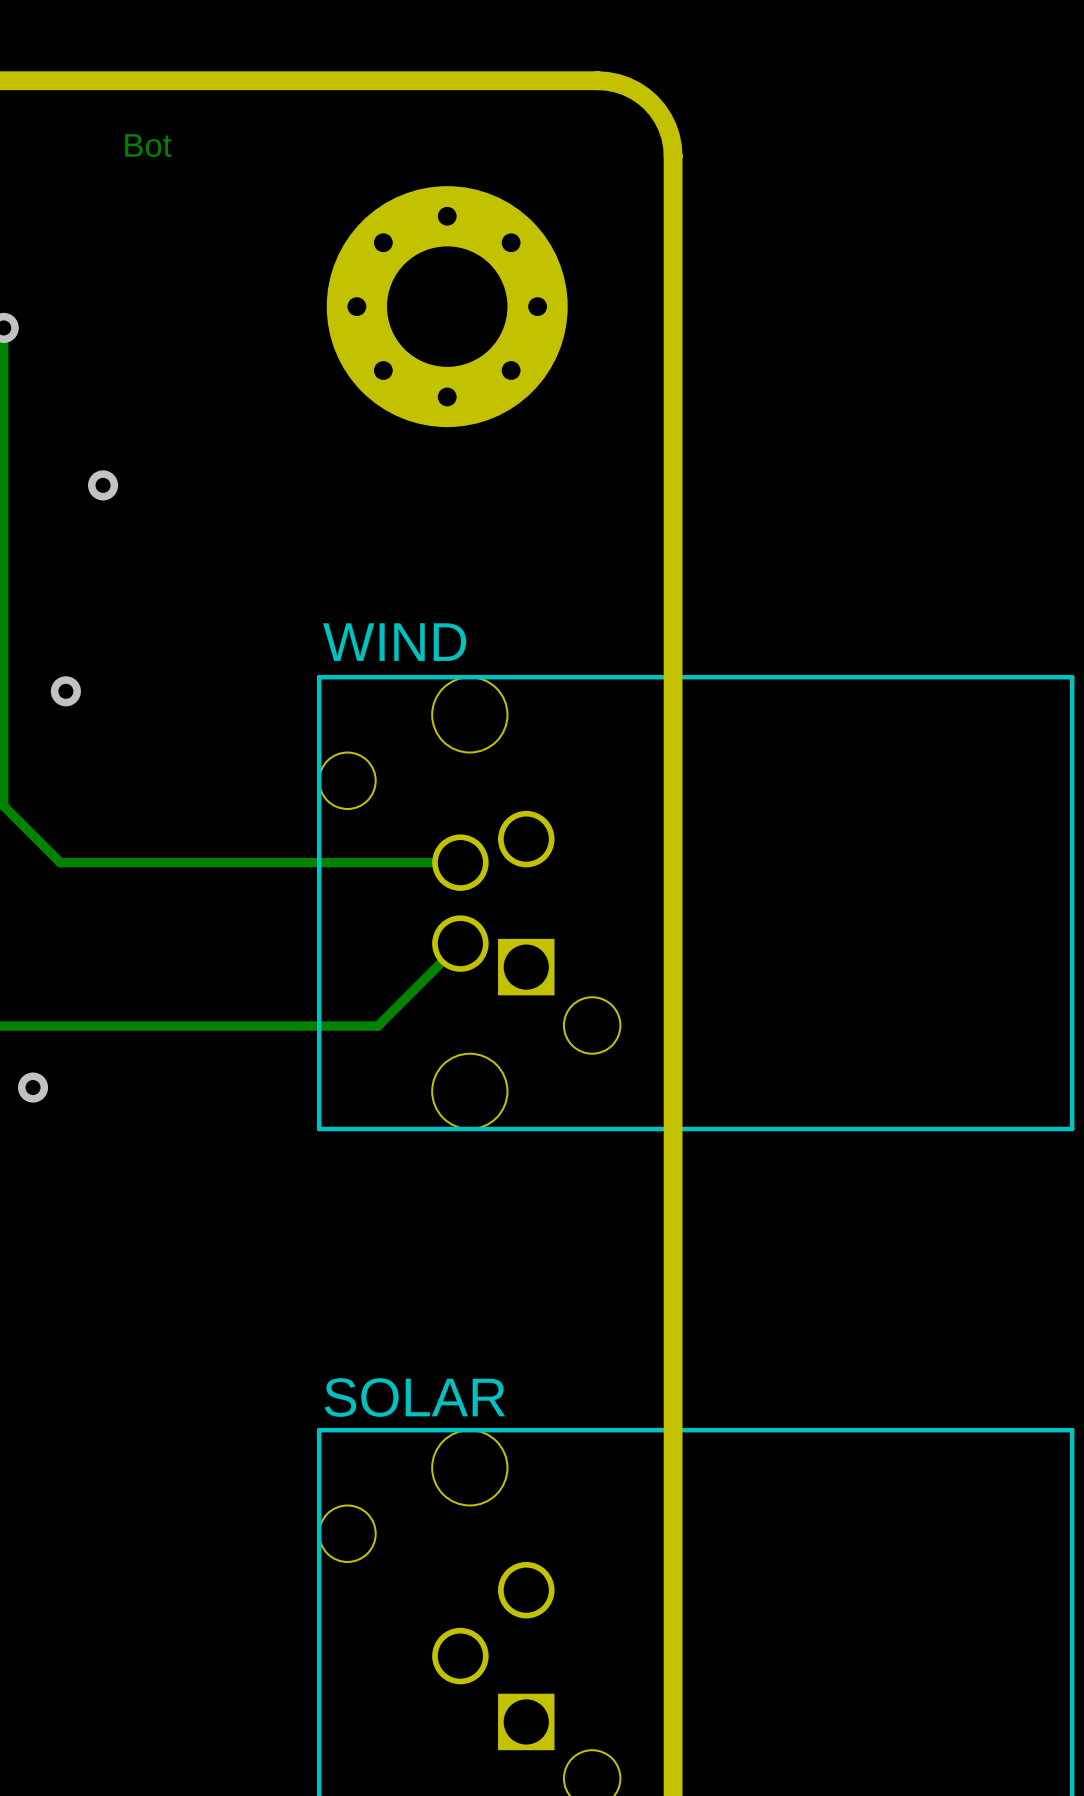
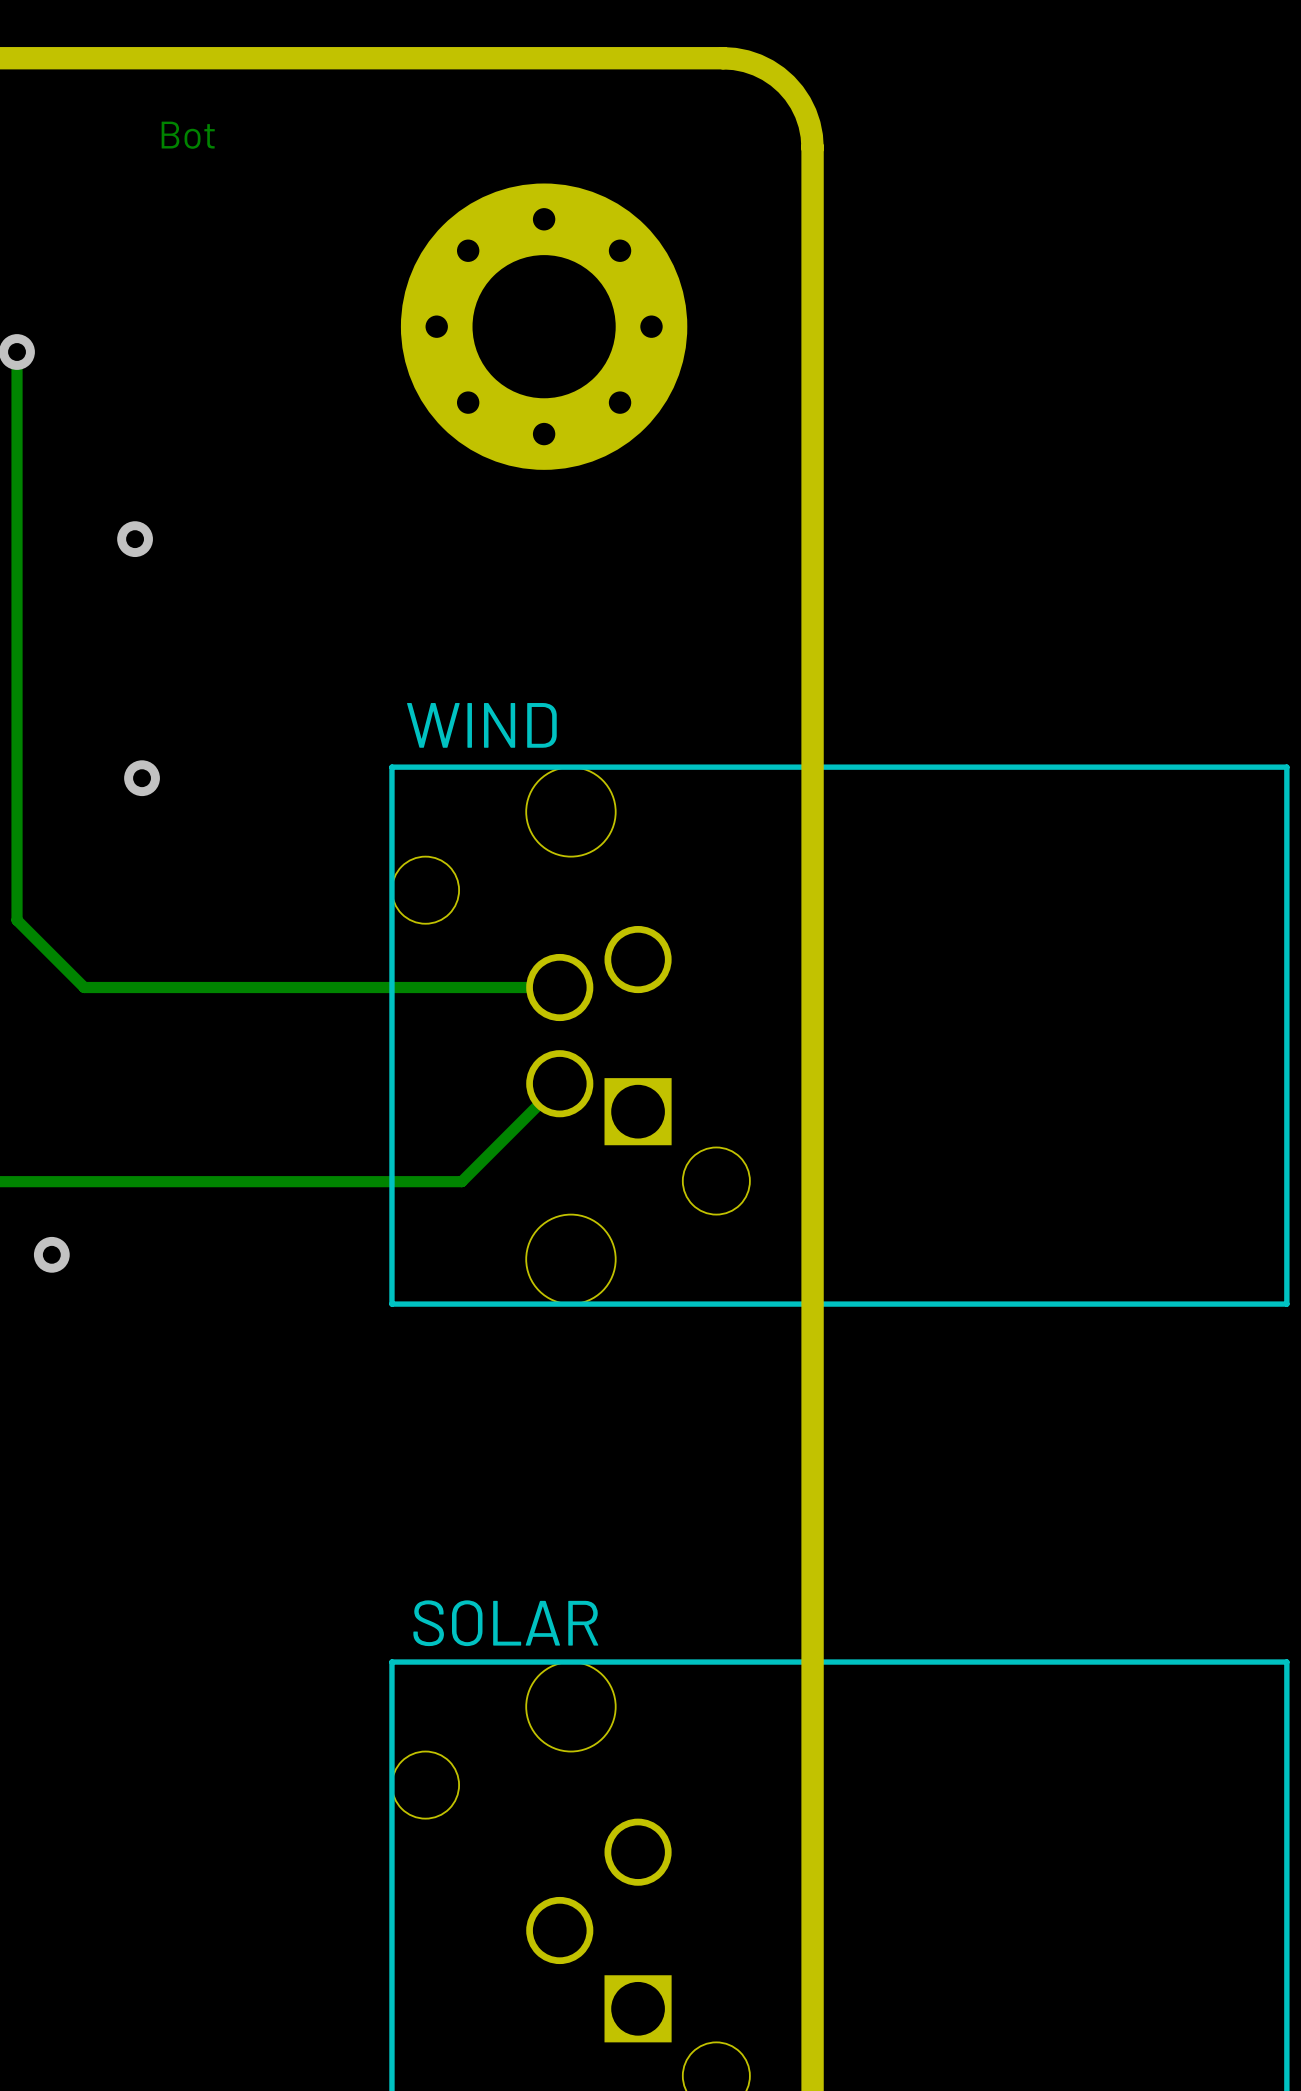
via position: (65, 691) -> (142, 778)

